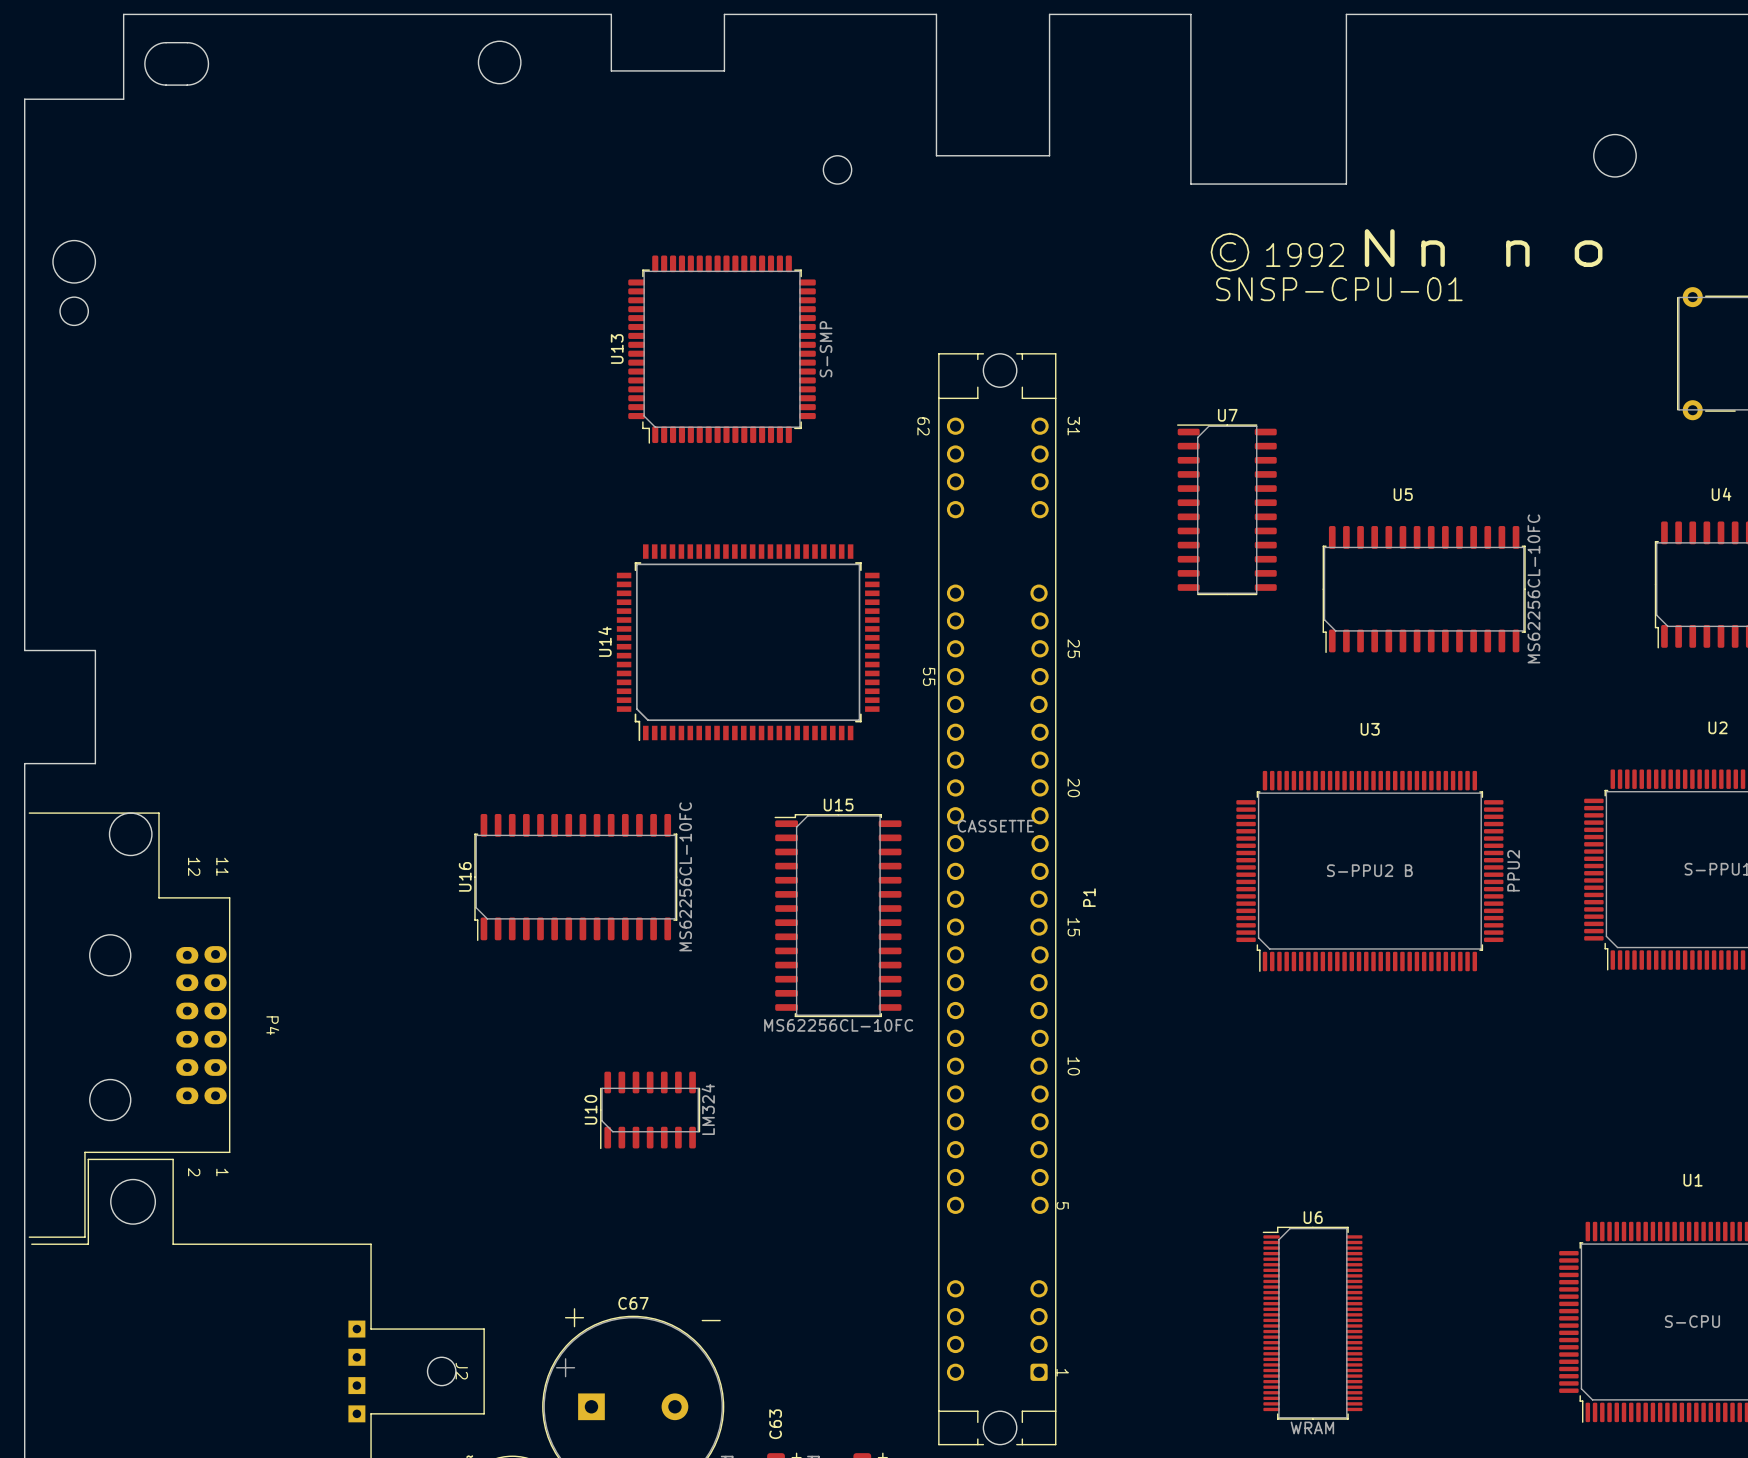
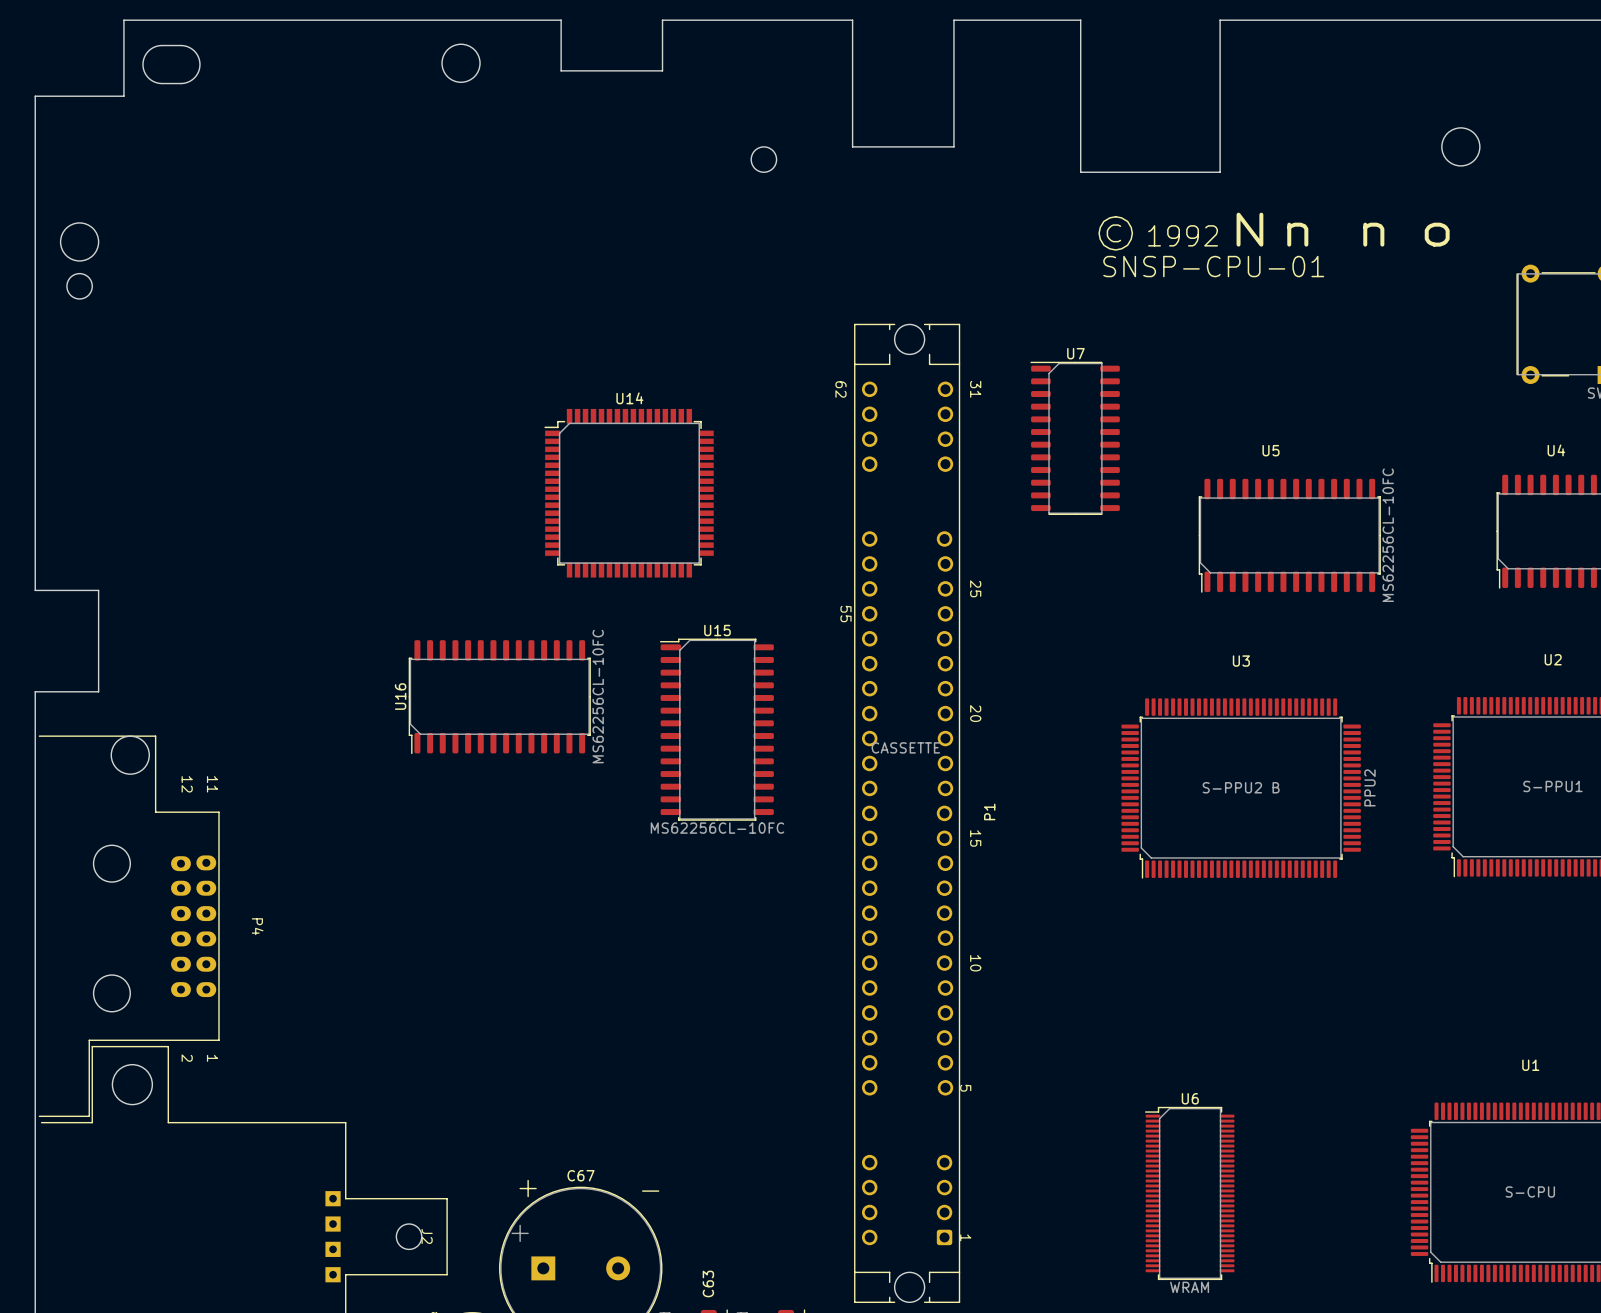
U13: S-SMP (722, 349) -> none
U7 position: (1226, 509) -> (1075, 438)
U14 footprint: [616, 544, 880, 742] -> [544, 408, 714, 578]
U14 name position: U14 (605, 641) -> U14 (629, 398)
U16 position: (575, 877) -> (499, 697)
U15 position: (838, 915) -> (716, 729)
U10: LM324 (650, 1110) -> none

